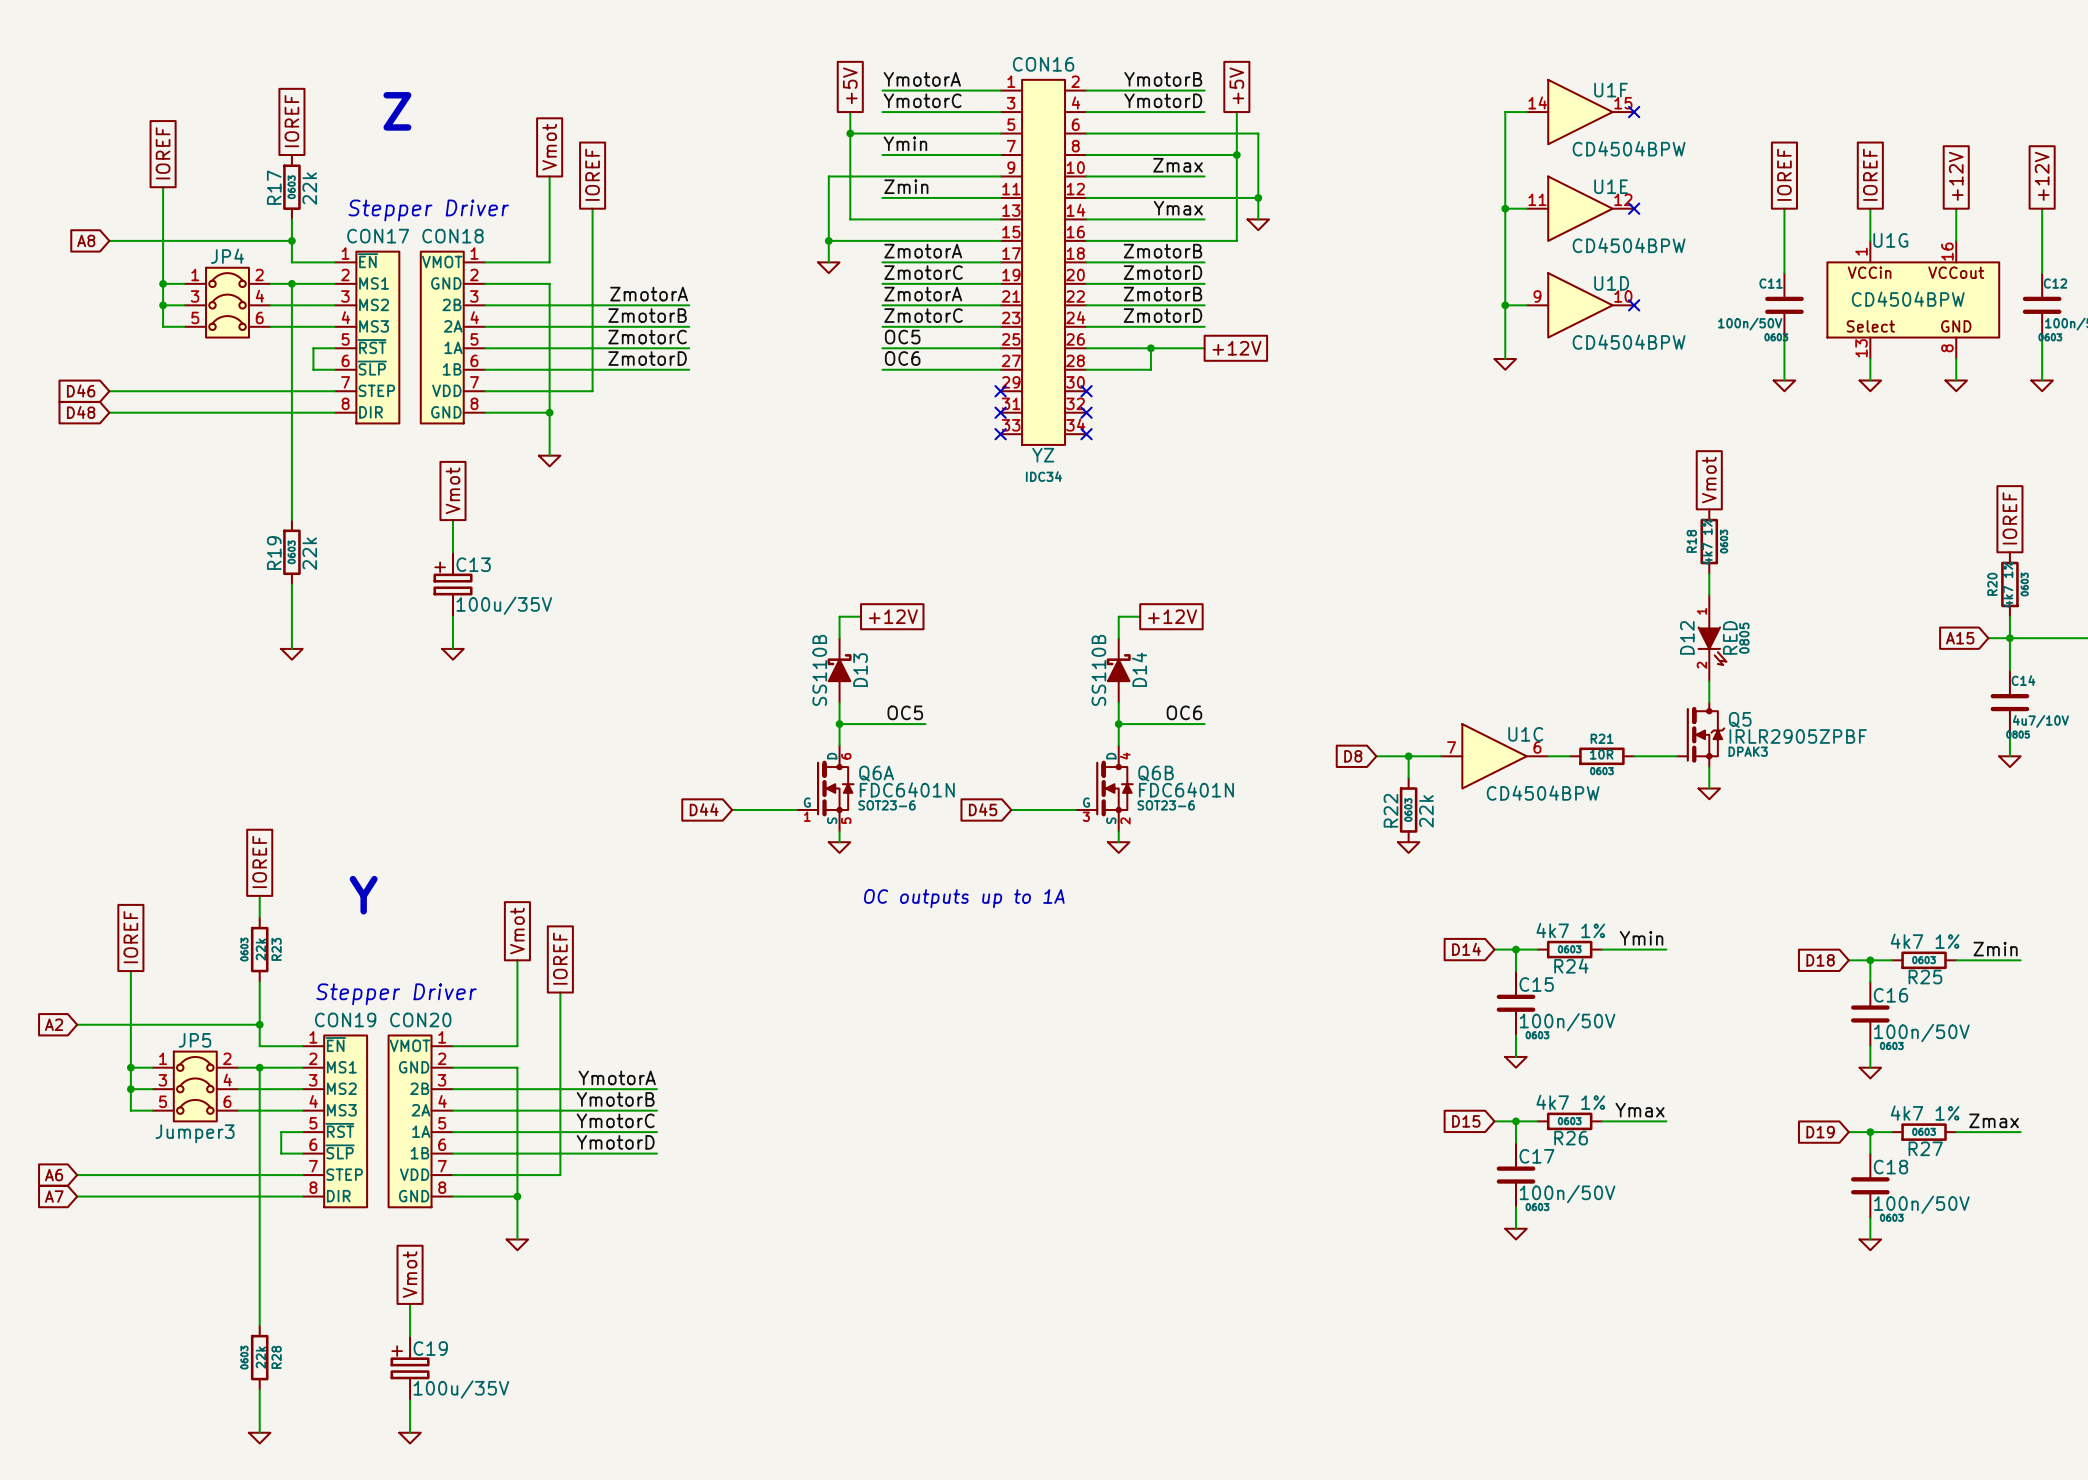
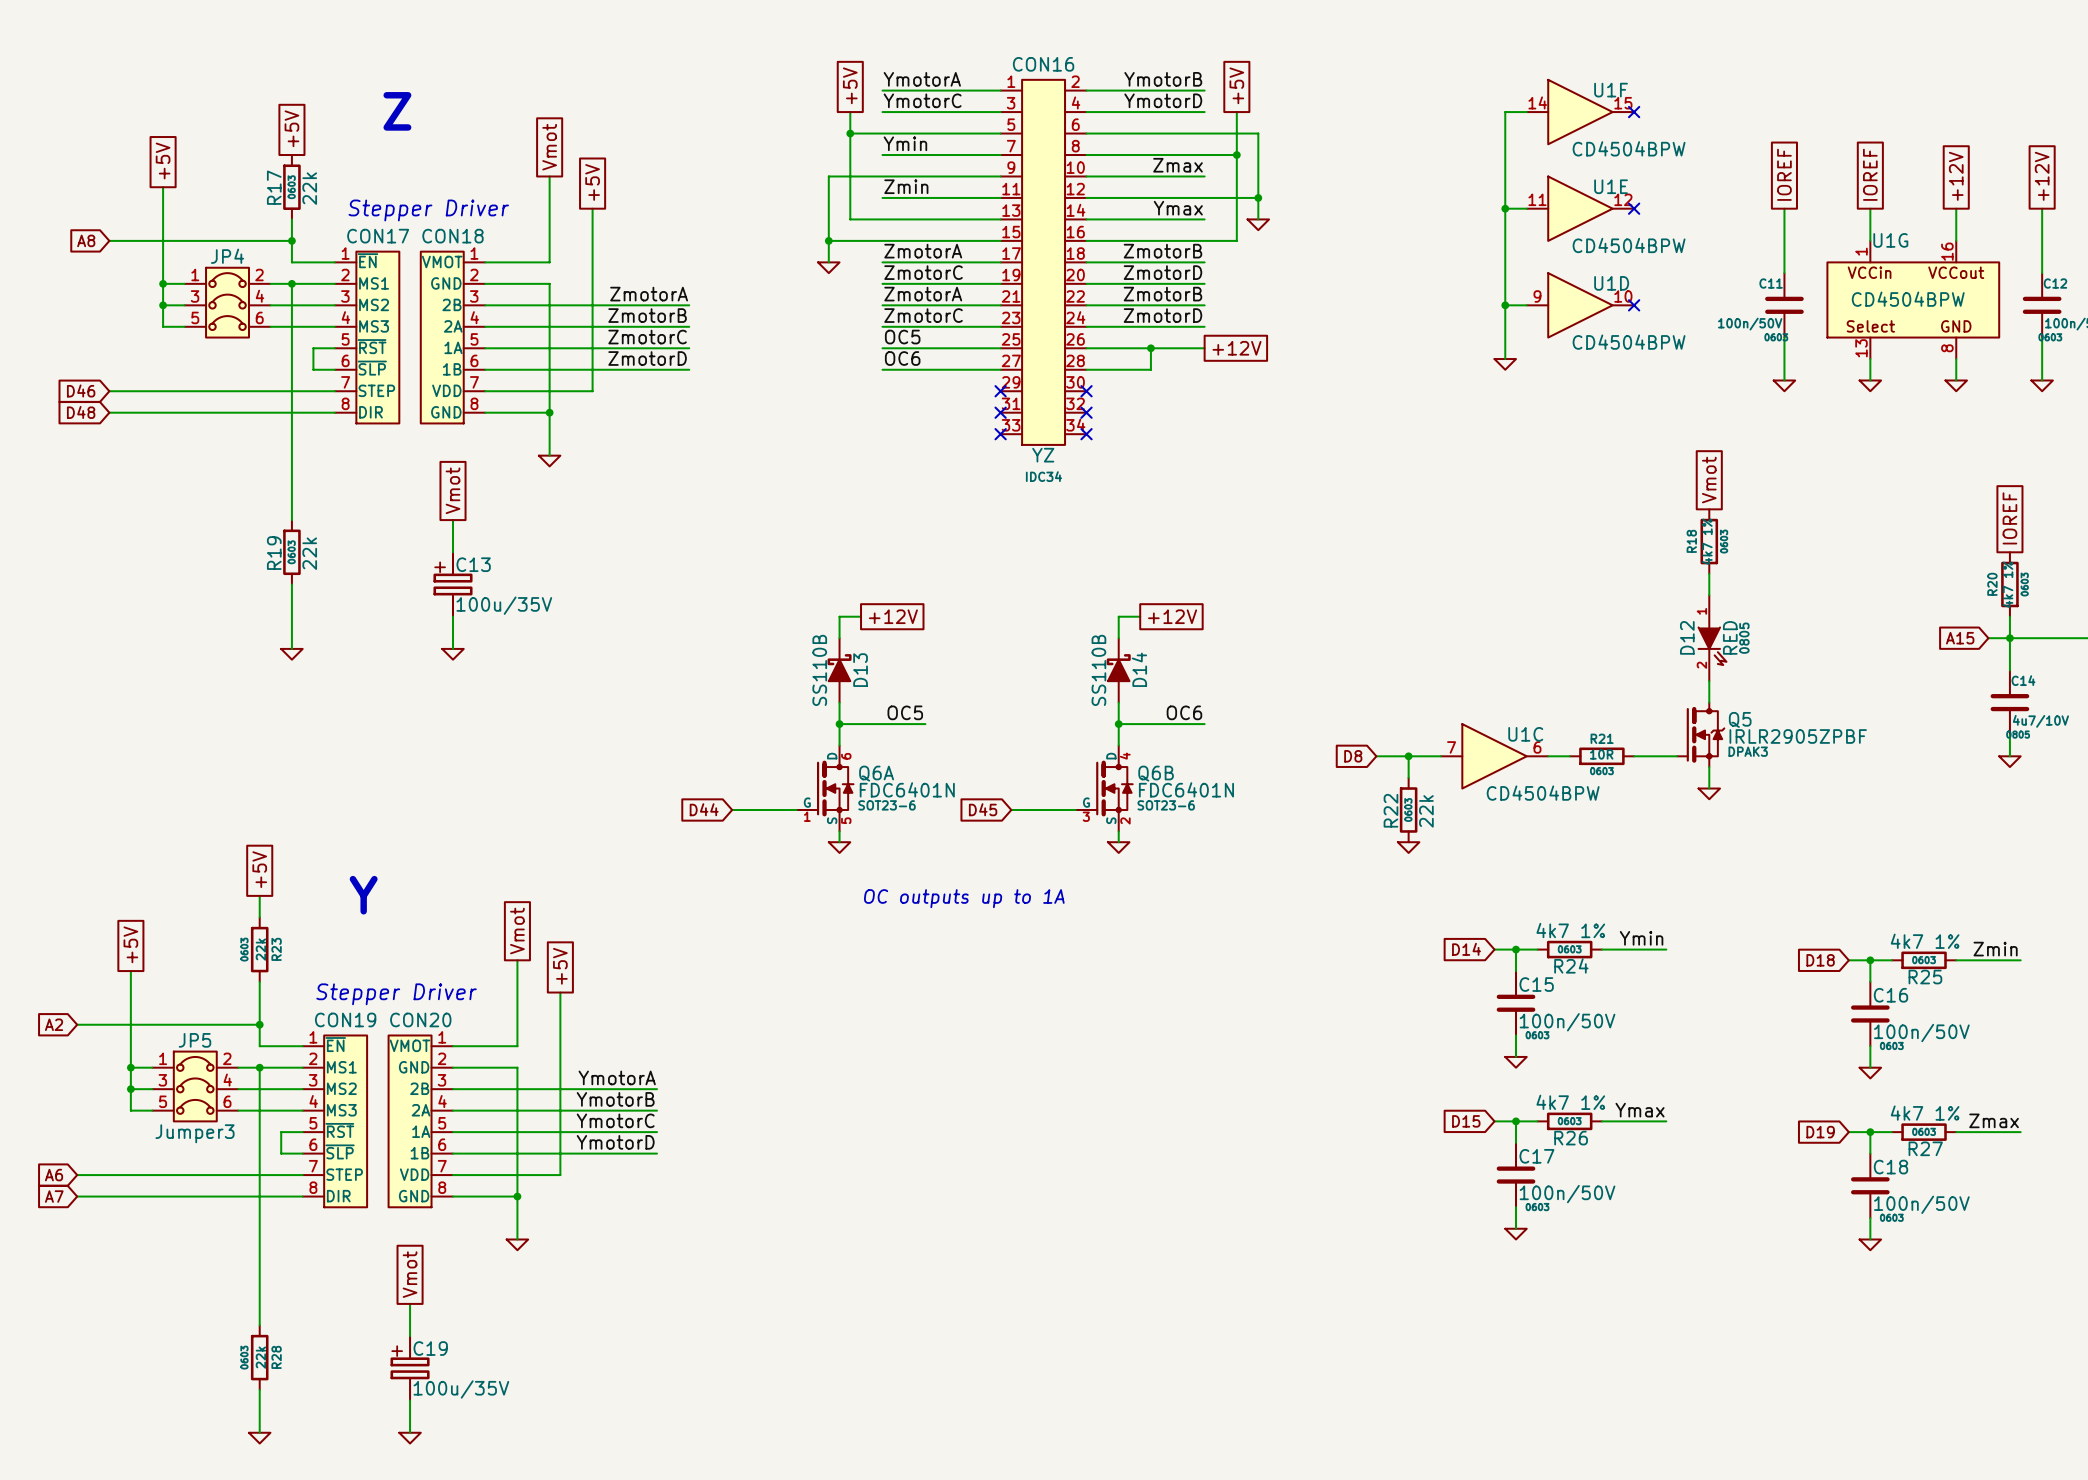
global label: IOREF (291, 121) -> +5V (291, 128)
global label: IOREF (163, 153) -> +5V (163, 160)
global label: IOREF (592, 174) -> +5V (592, 182)
global label: IOREF (259, 861) -> +5V (259, 869)
global label: IOREF (130, 937) -> +5V (130, 944)
global label: IOREF (560, 958) -> +5V (560, 966)

